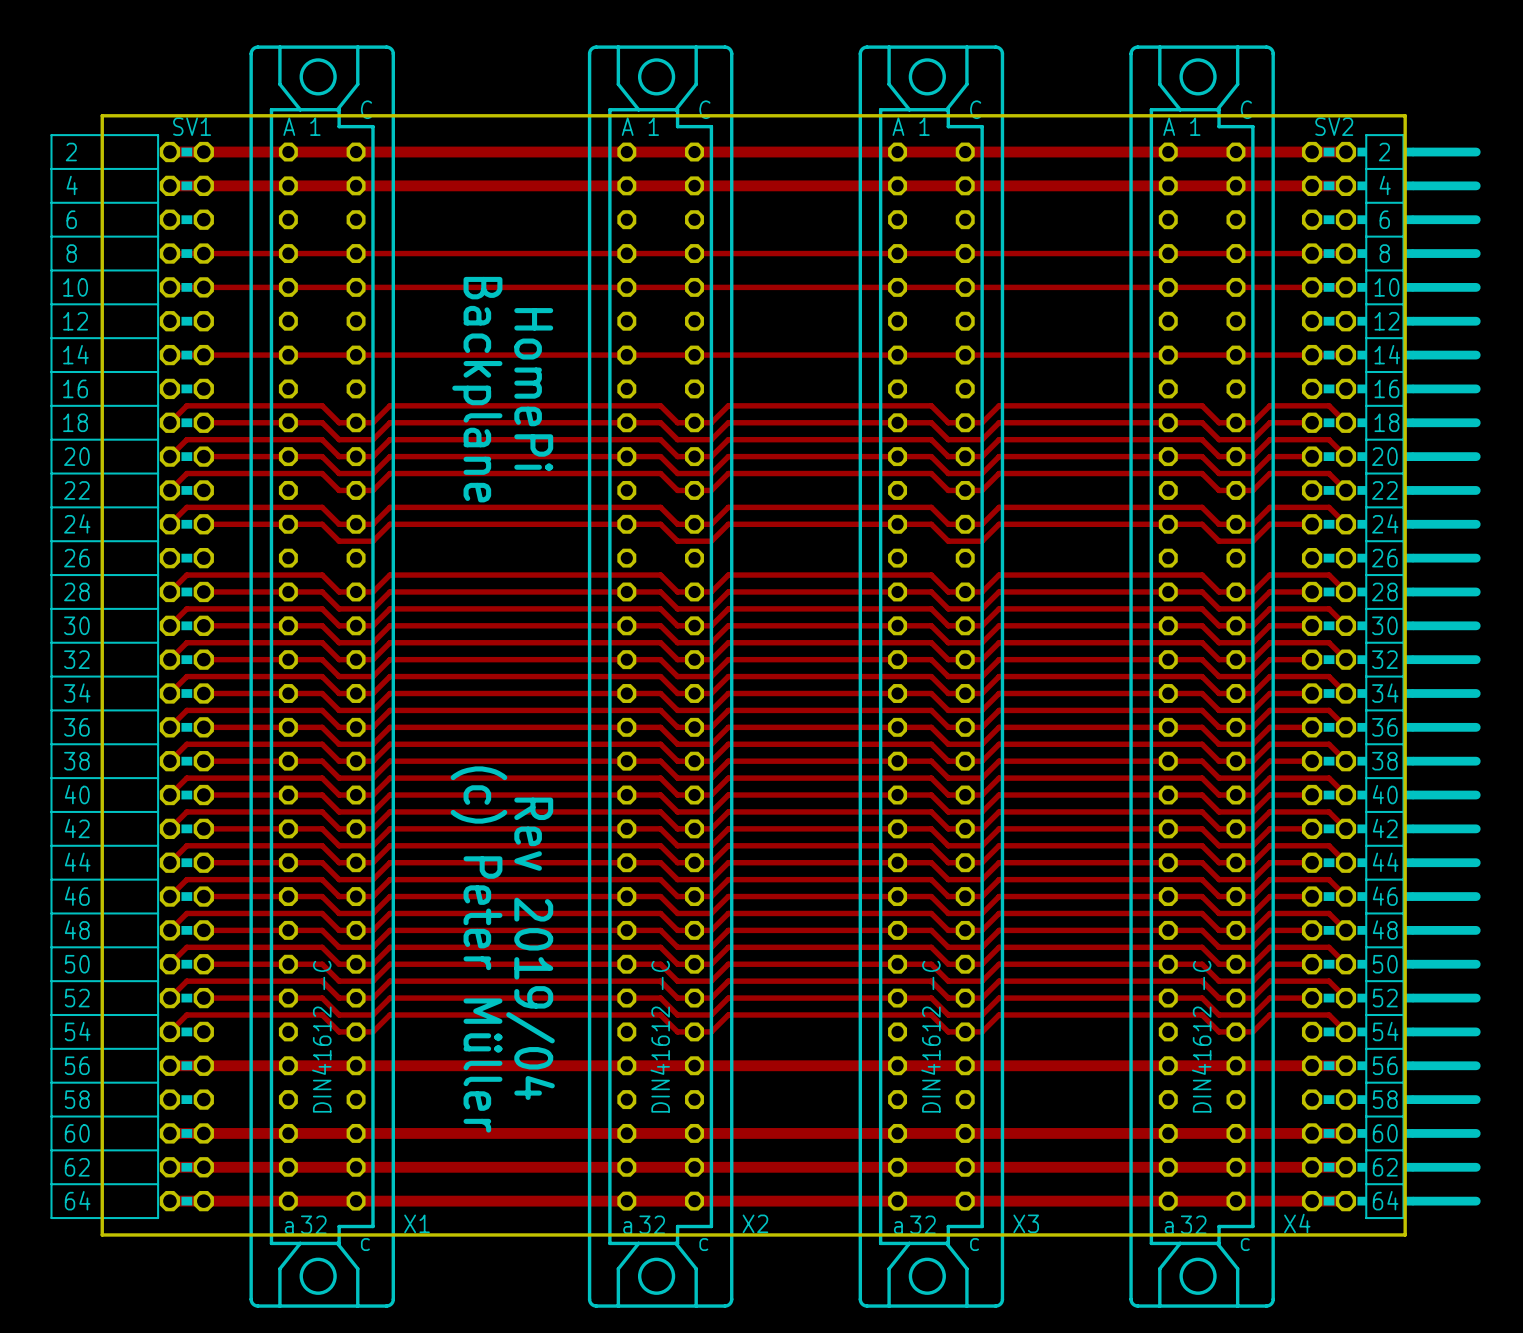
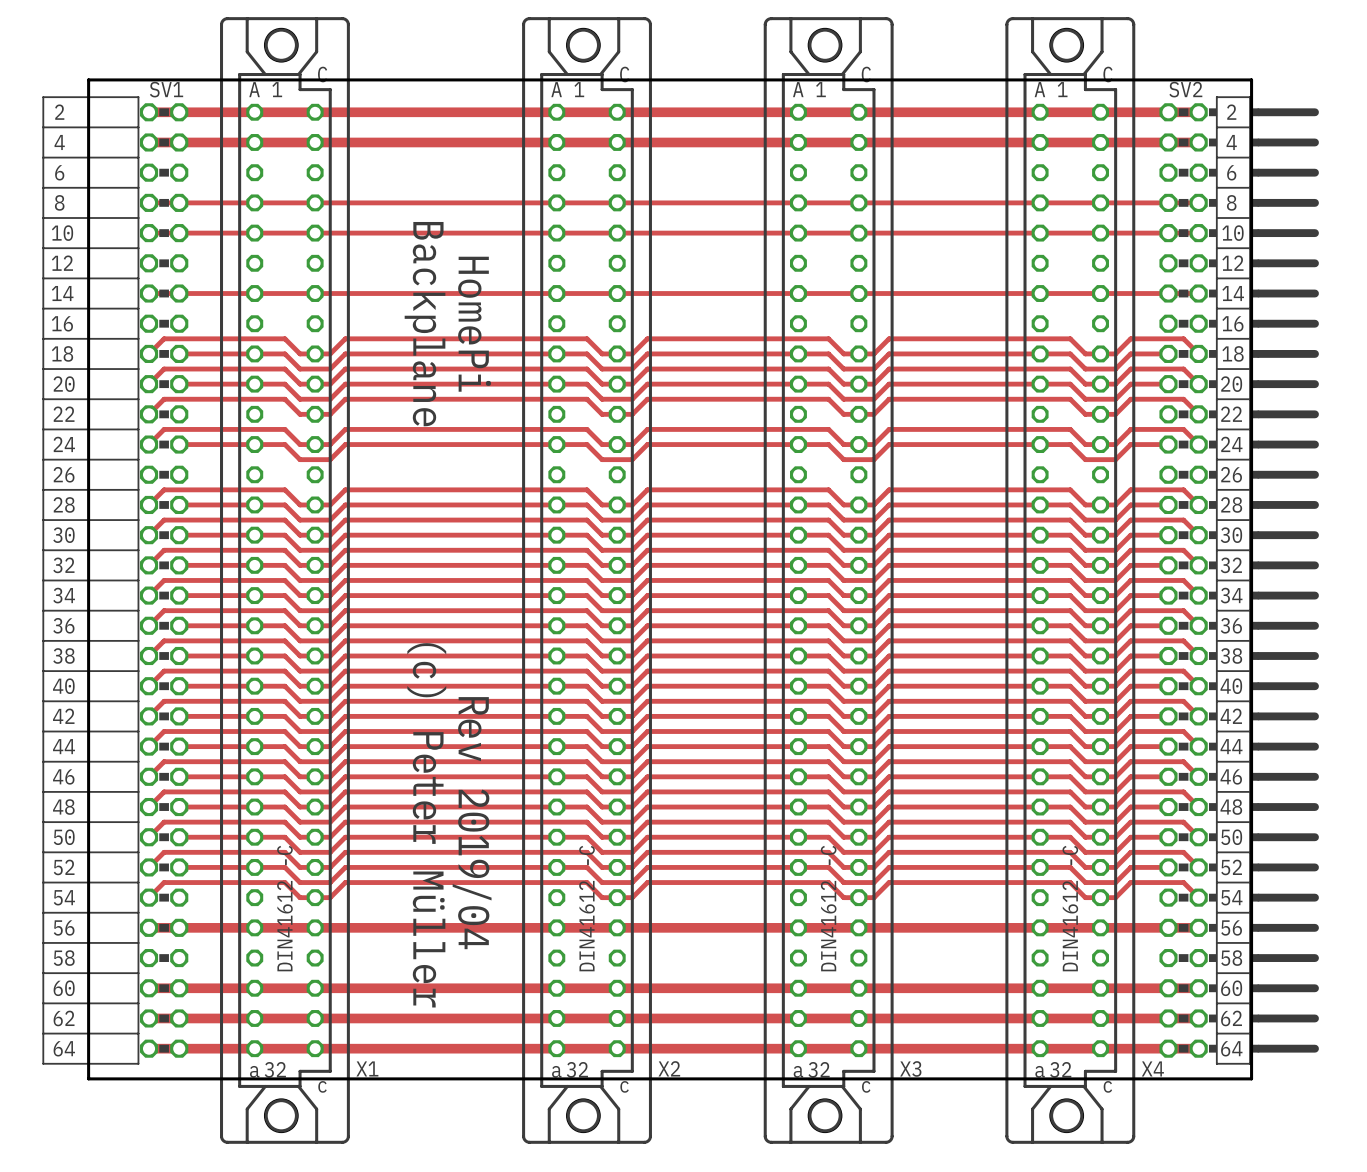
X1 footprint: [249, 45, 395, 1308] -> [220, 17, 350, 1144]
X2 footprint: [587, 45, 734, 1308] -> [522, 17, 652, 1144]
X3 footprint: [858, 45, 1005, 1308] -> [763, 17, 894, 1144]
X4 footprint: [1129, 45, 1275, 1308] -> [1005, 17, 1136, 1144]

